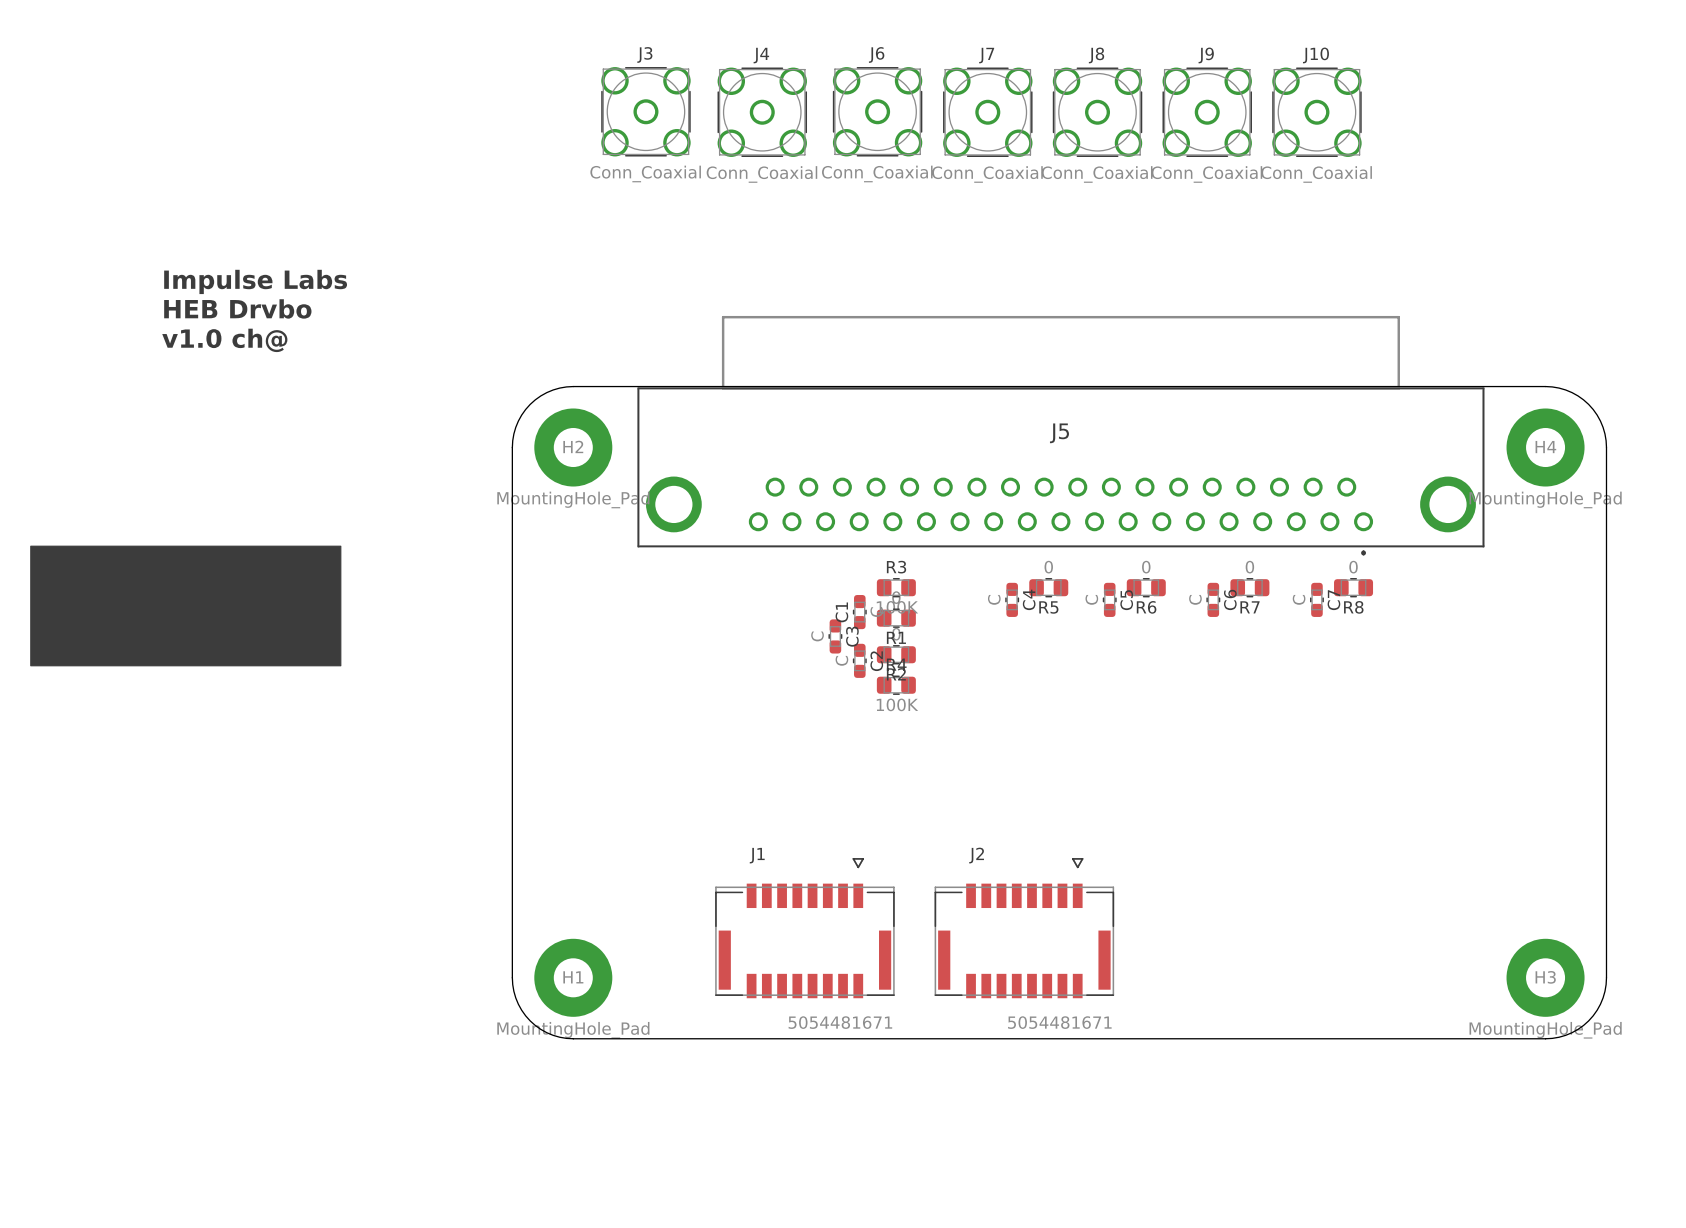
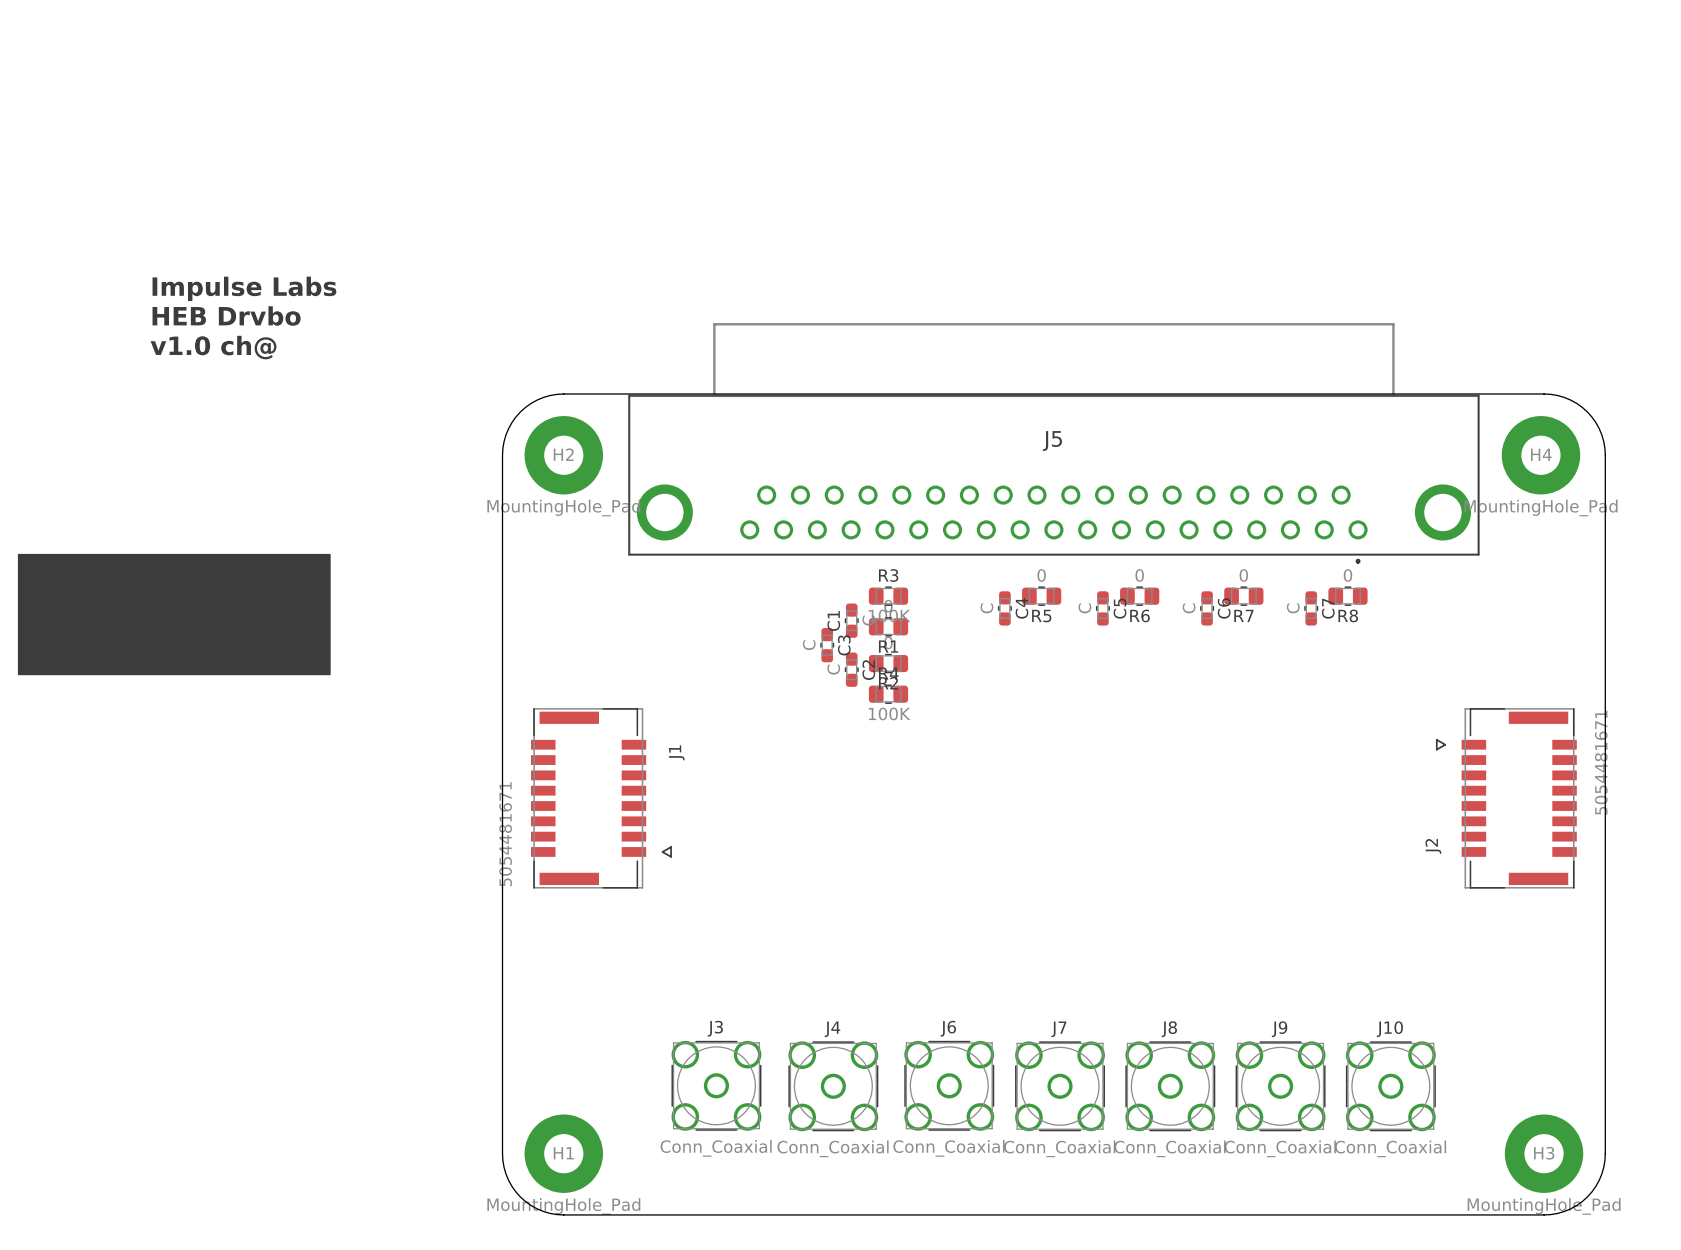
J3 position: (645, 111) -> (716, 1085)
J6 position: (877, 111) -> (949, 1085)
J4 position: (762, 112) -> (833, 1086)
J7 position: (987, 112) -> (1060, 1086)
J8 position: (1097, 112) -> (1170, 1086)
J9 position: (1207, 112) -> (1280, 1086)
J10 position: (1316, 112) -> (1390, 1086)
board edge: (1545, 386) (1565, 389) (1577, 395) (1588, 404) (1600, 421) (1604, 433) (1606, 447) (1606, 977) (1604, 991) (1597, 1010) (1588, 1020) (1577, 1029) (1565, 1035) (1545, 1038) (573, 1038) (559, 1037) (546, 1032) (530, 1020) (521, 1010) (515, 997) (512, 977) -> (1540, 393) (1564, 397) (1576, 403) (1587, 411) (1595, 422) (1601, 435) (1605, 455) (1605, 1153) (1603, 1167) (1595, 1186) (1587, 1197) (1576, 1205) (1557, 1213) (1544, 1214) (563, 1214) (550, 1213) (537, 1208) (520, 1197) (511, 1186) (504, 1167) (502, 988)
J1 rotation: 0° (804, 928) -> 90° clockwise (601, 798)
J1 position: (804, 928) -> (601, 798)
J2 rotation: 0° (1024, 928) -> 90° counterclockwise (1506, 798)
J2 position: (1024, 928) -> (1506, 798)
H1 position: (573, 977) -> (563, 1153)
H3 position: (1545, 977) -> (1544, 1153)

